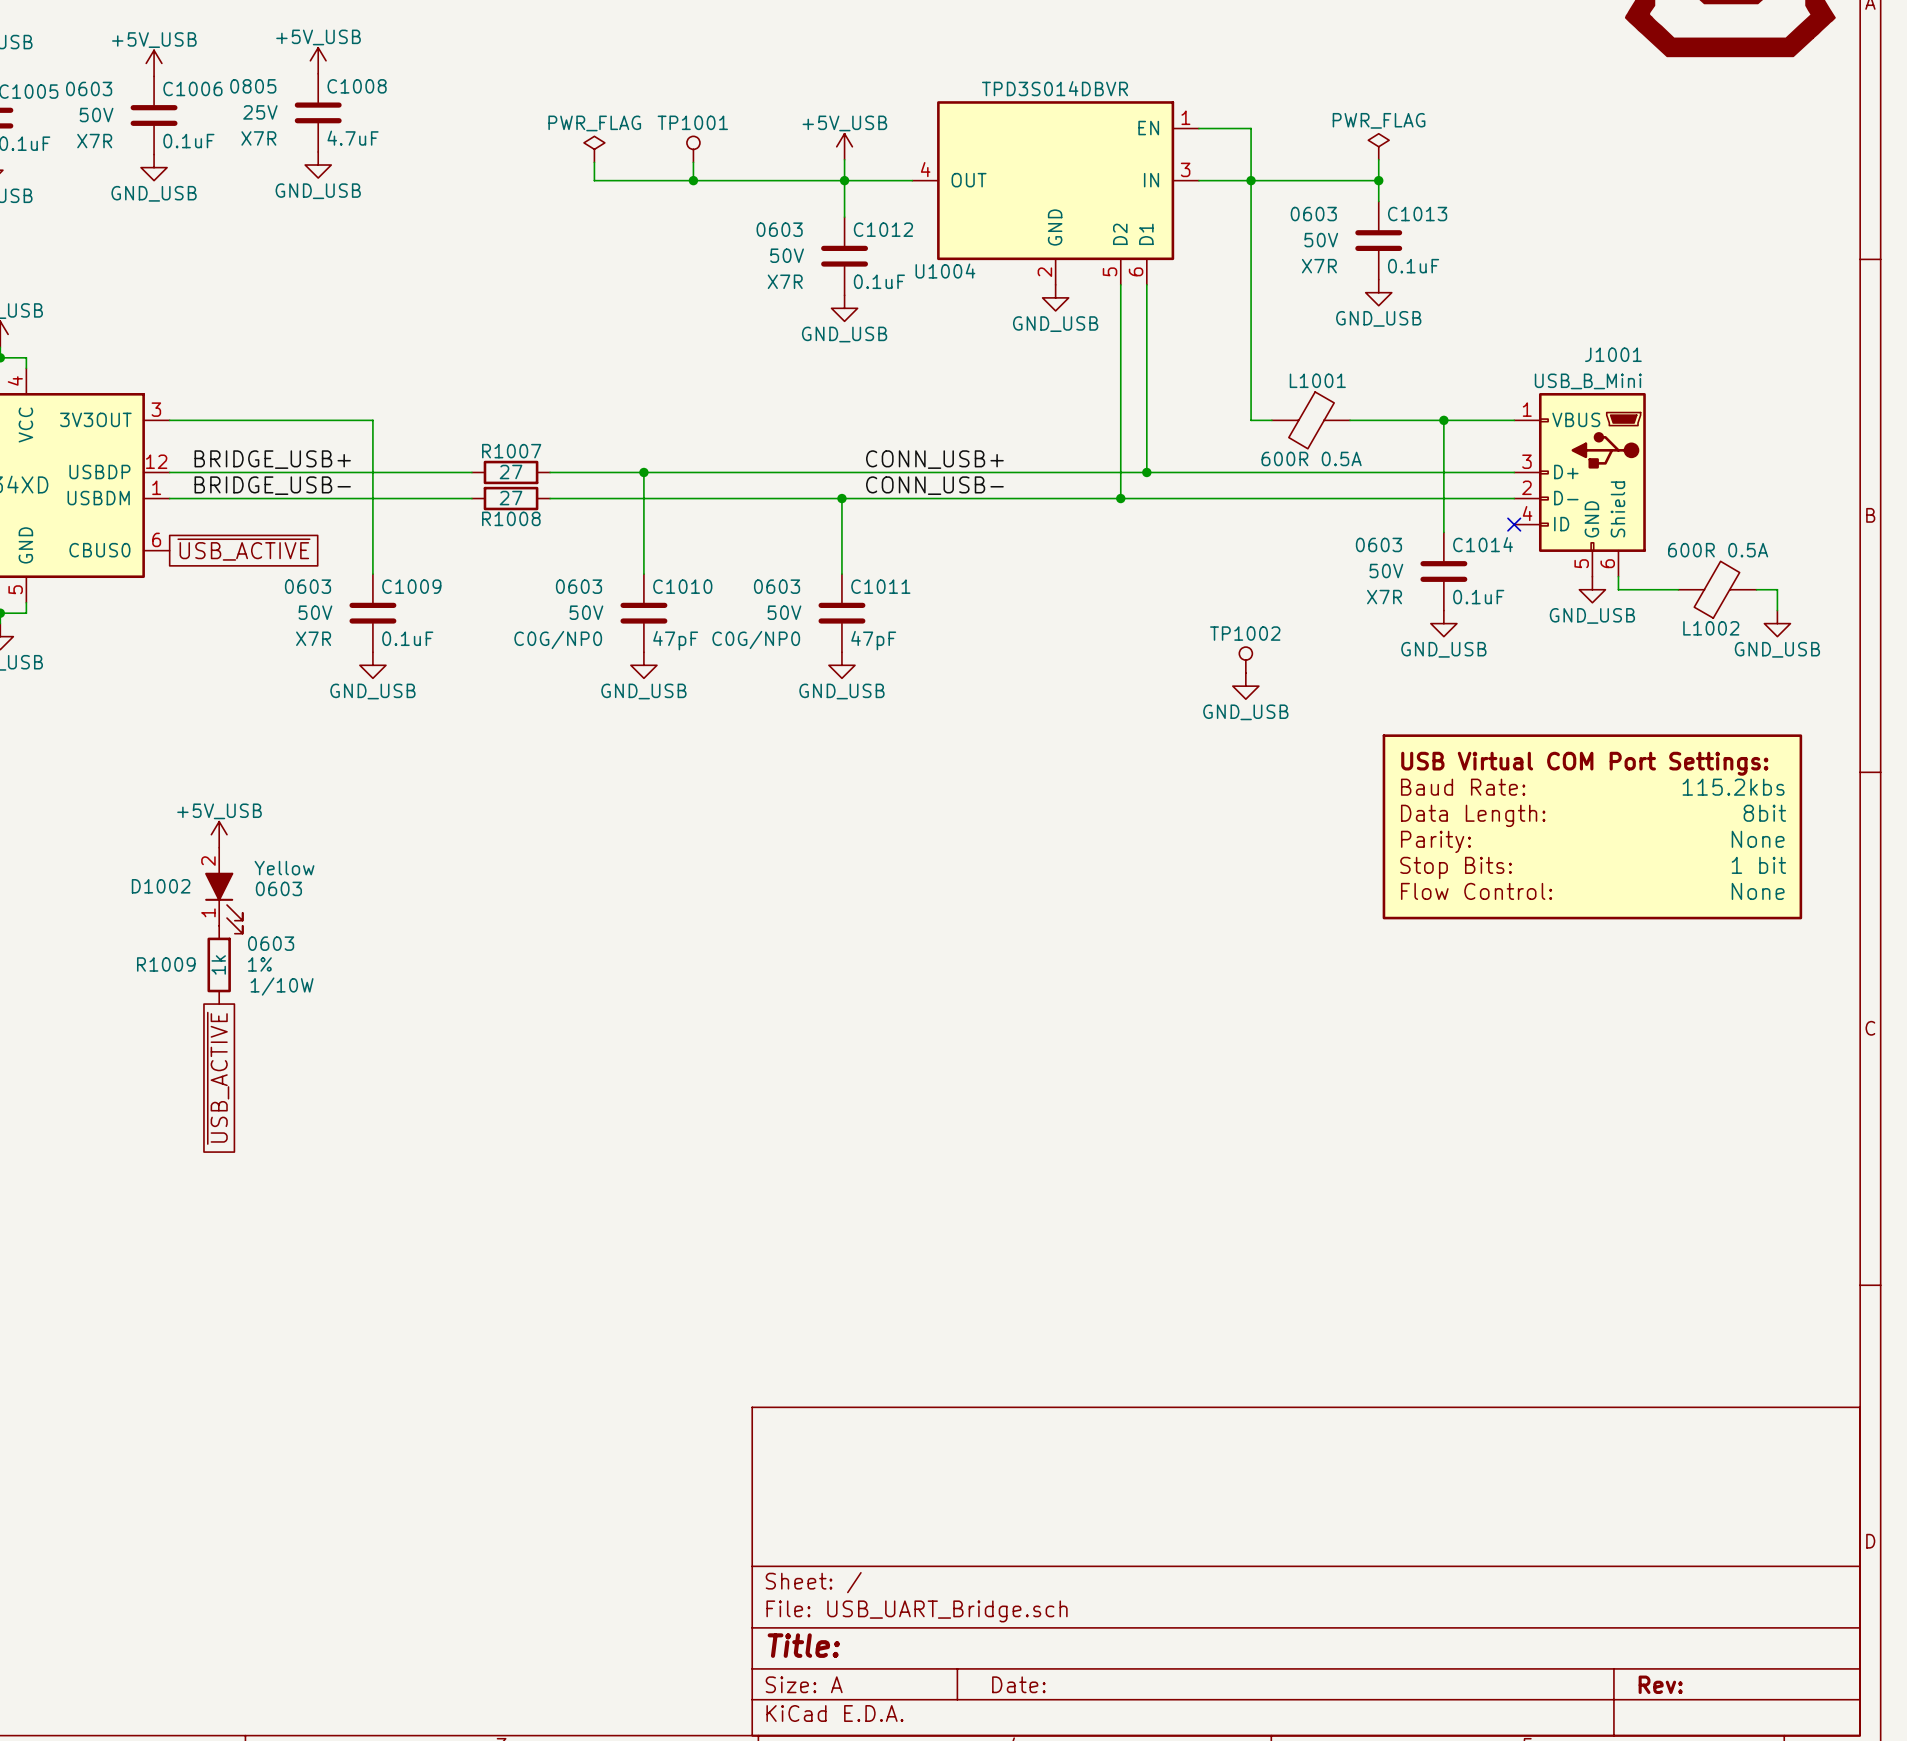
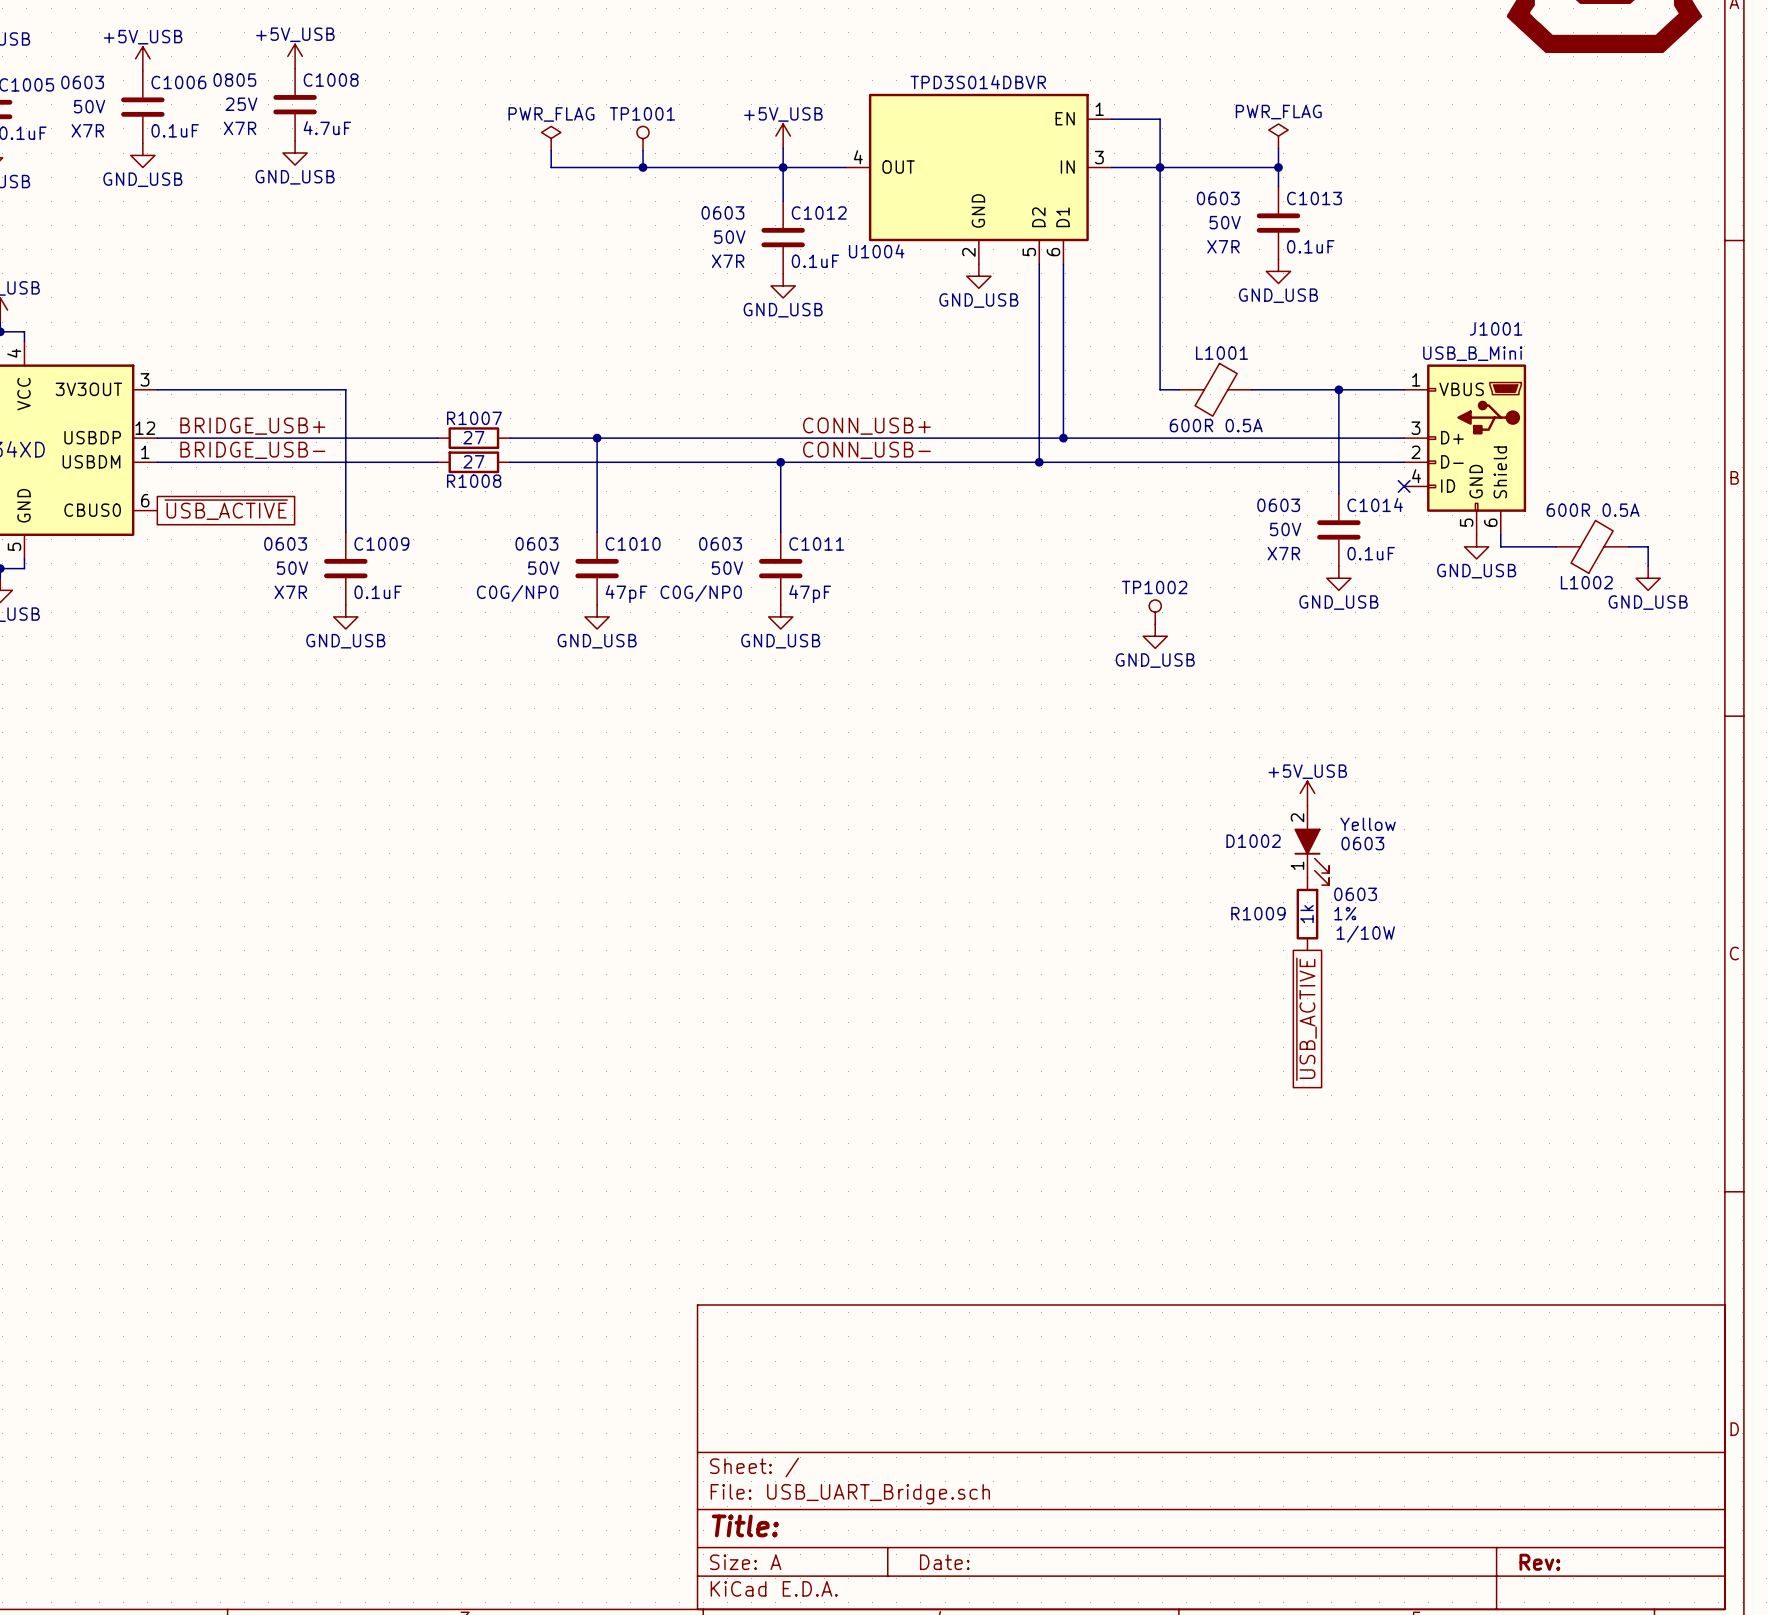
part: (1592, 826) -> none
power symbol: +5V_USB (219, 834) -> none
power symbol: none -> +5V_USB (1307, 793)
D1002 position: (223, 890) -> (1311, 845)
R1009 position: (219, 964) -> (1307, 914)
global label: ~{USB_ACTIVE} (218, 1078) -> none
global label: none -> ~{USB_ACTIVE} (1306, 1019)

